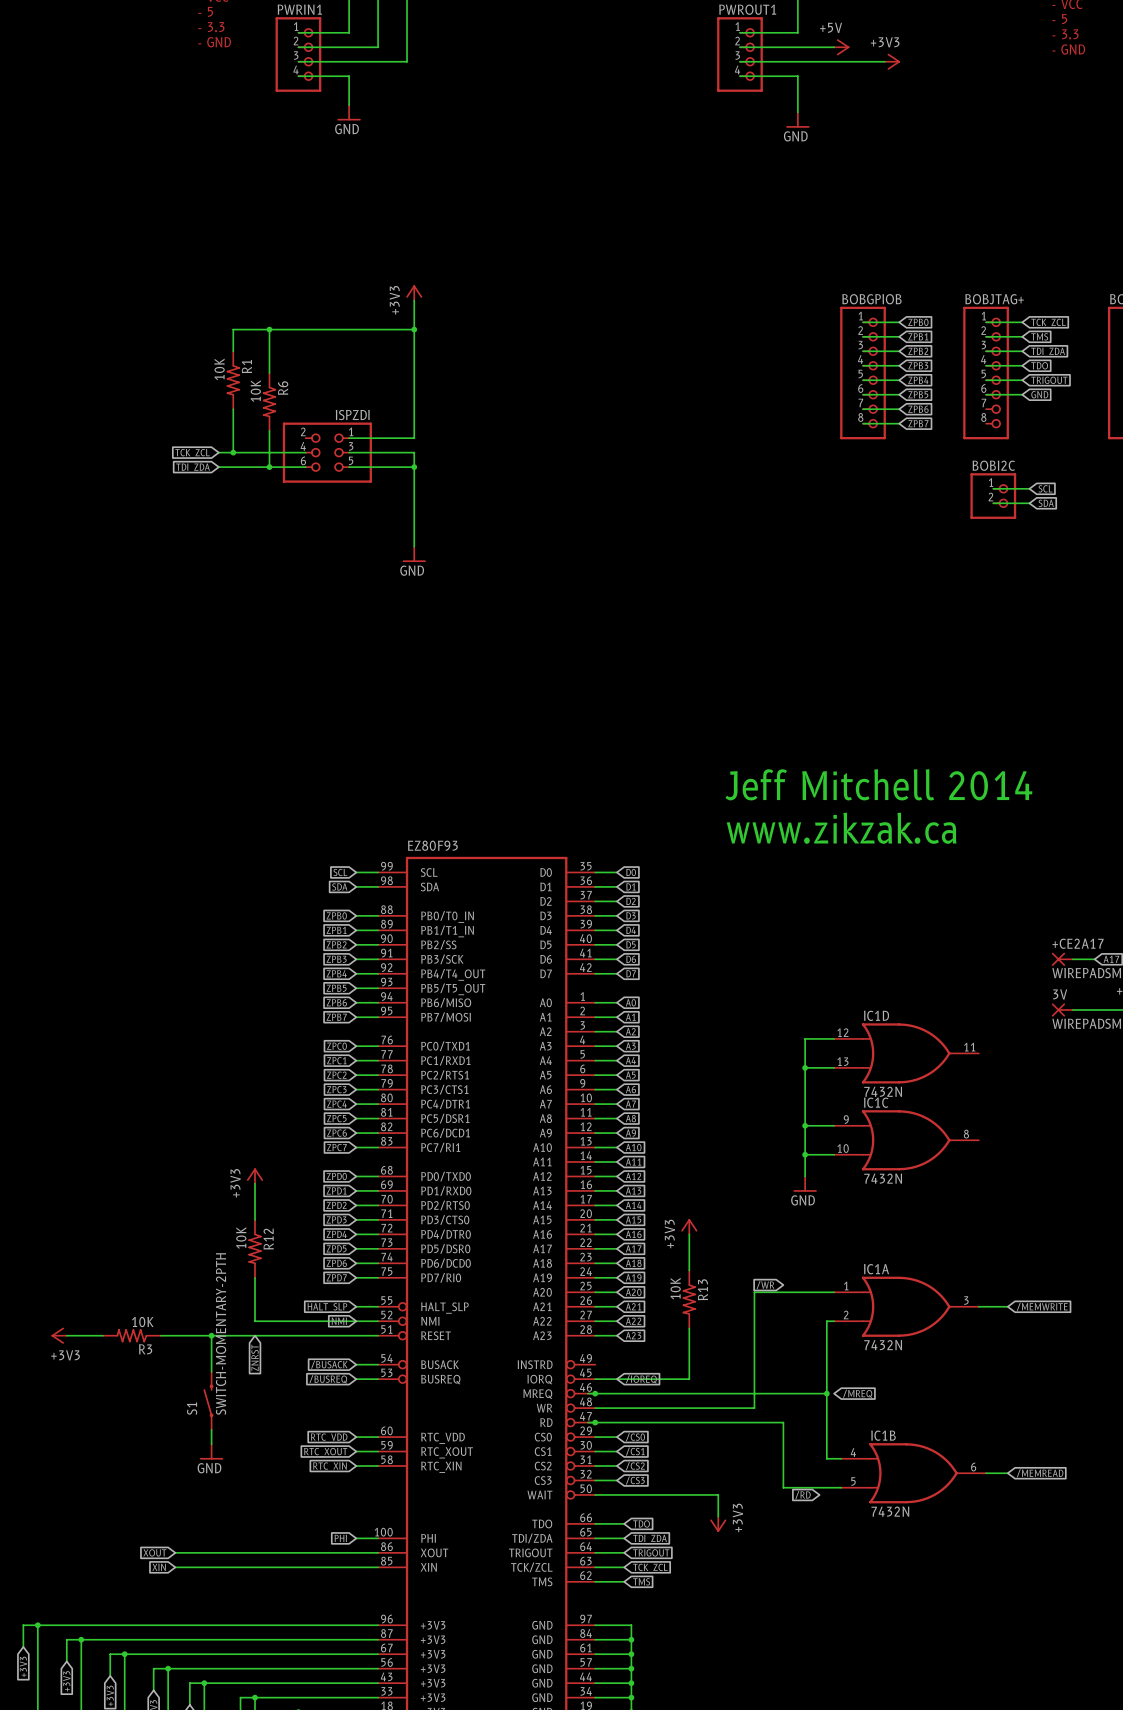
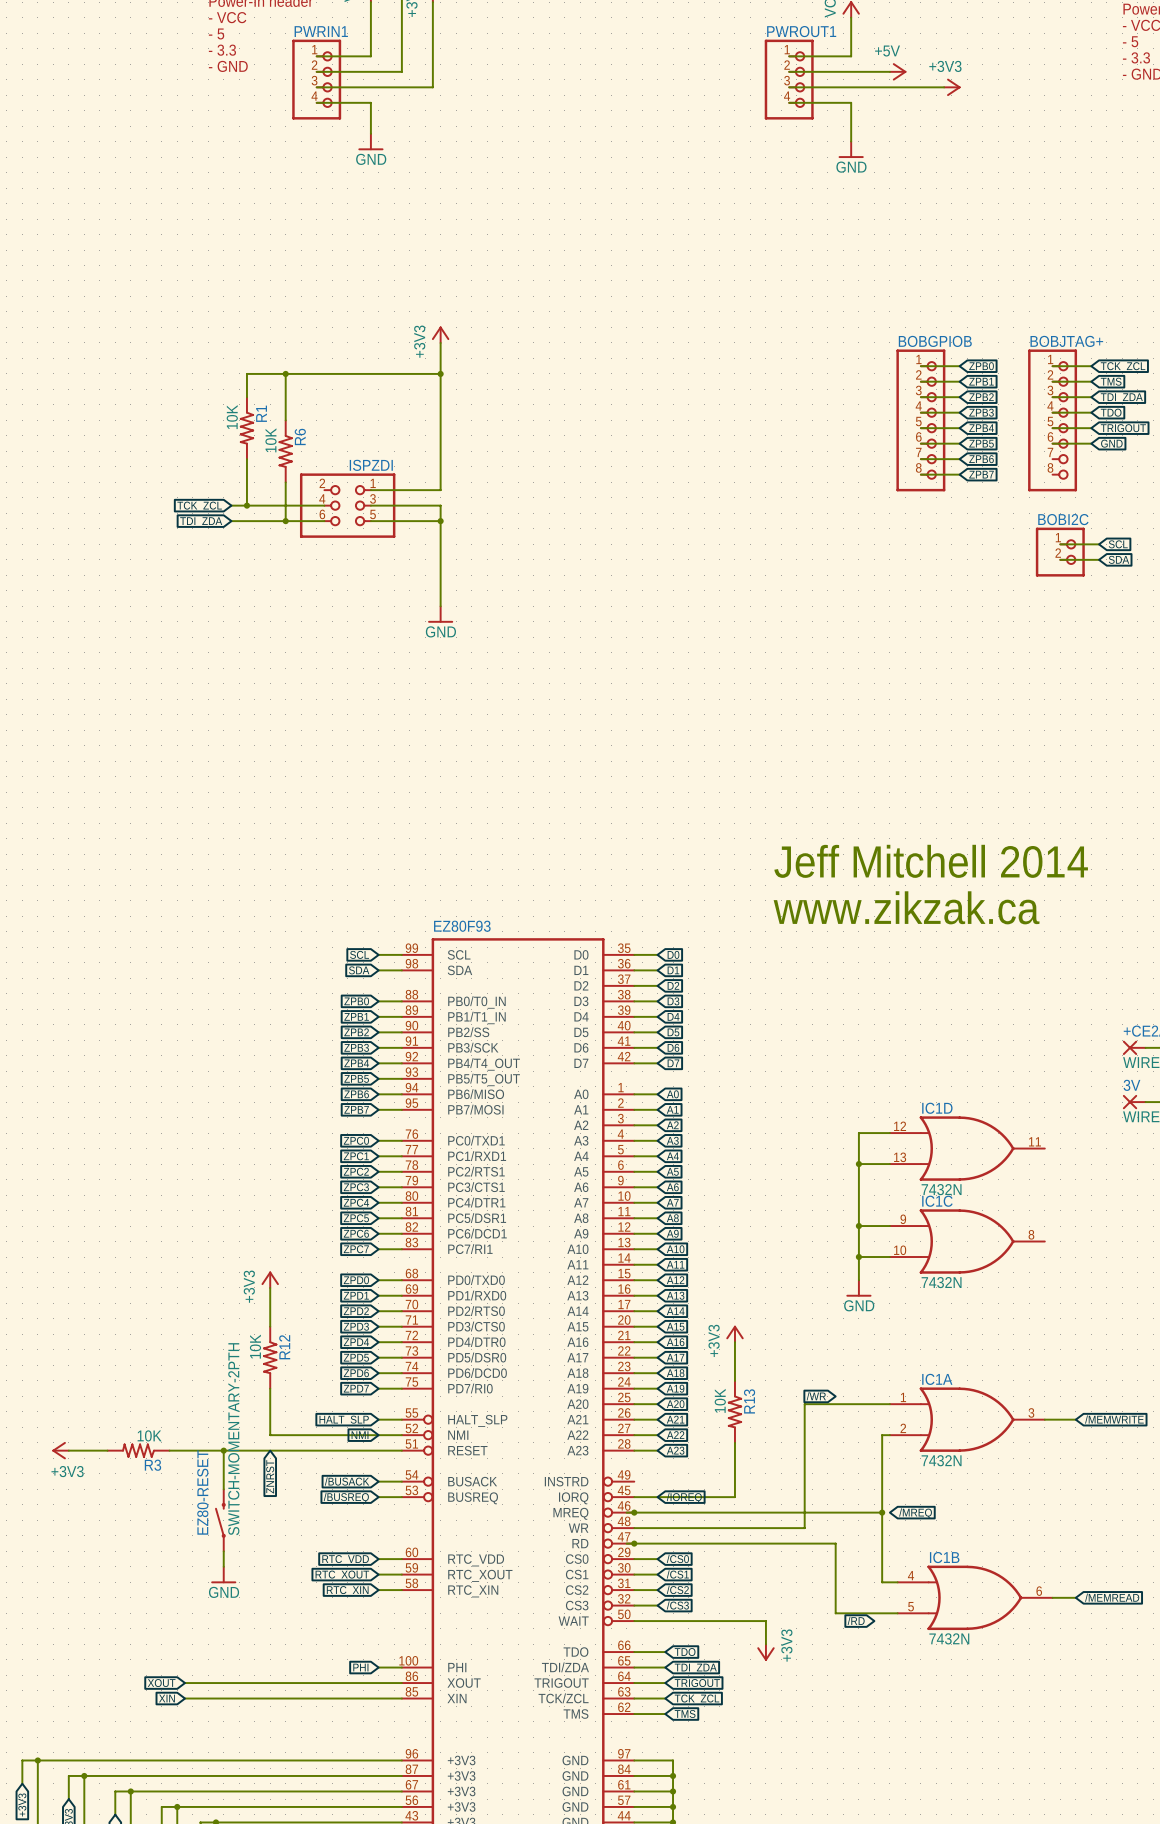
S1 name: S1 (192, 1408) -> EZ80-RESET (202, 1492)

